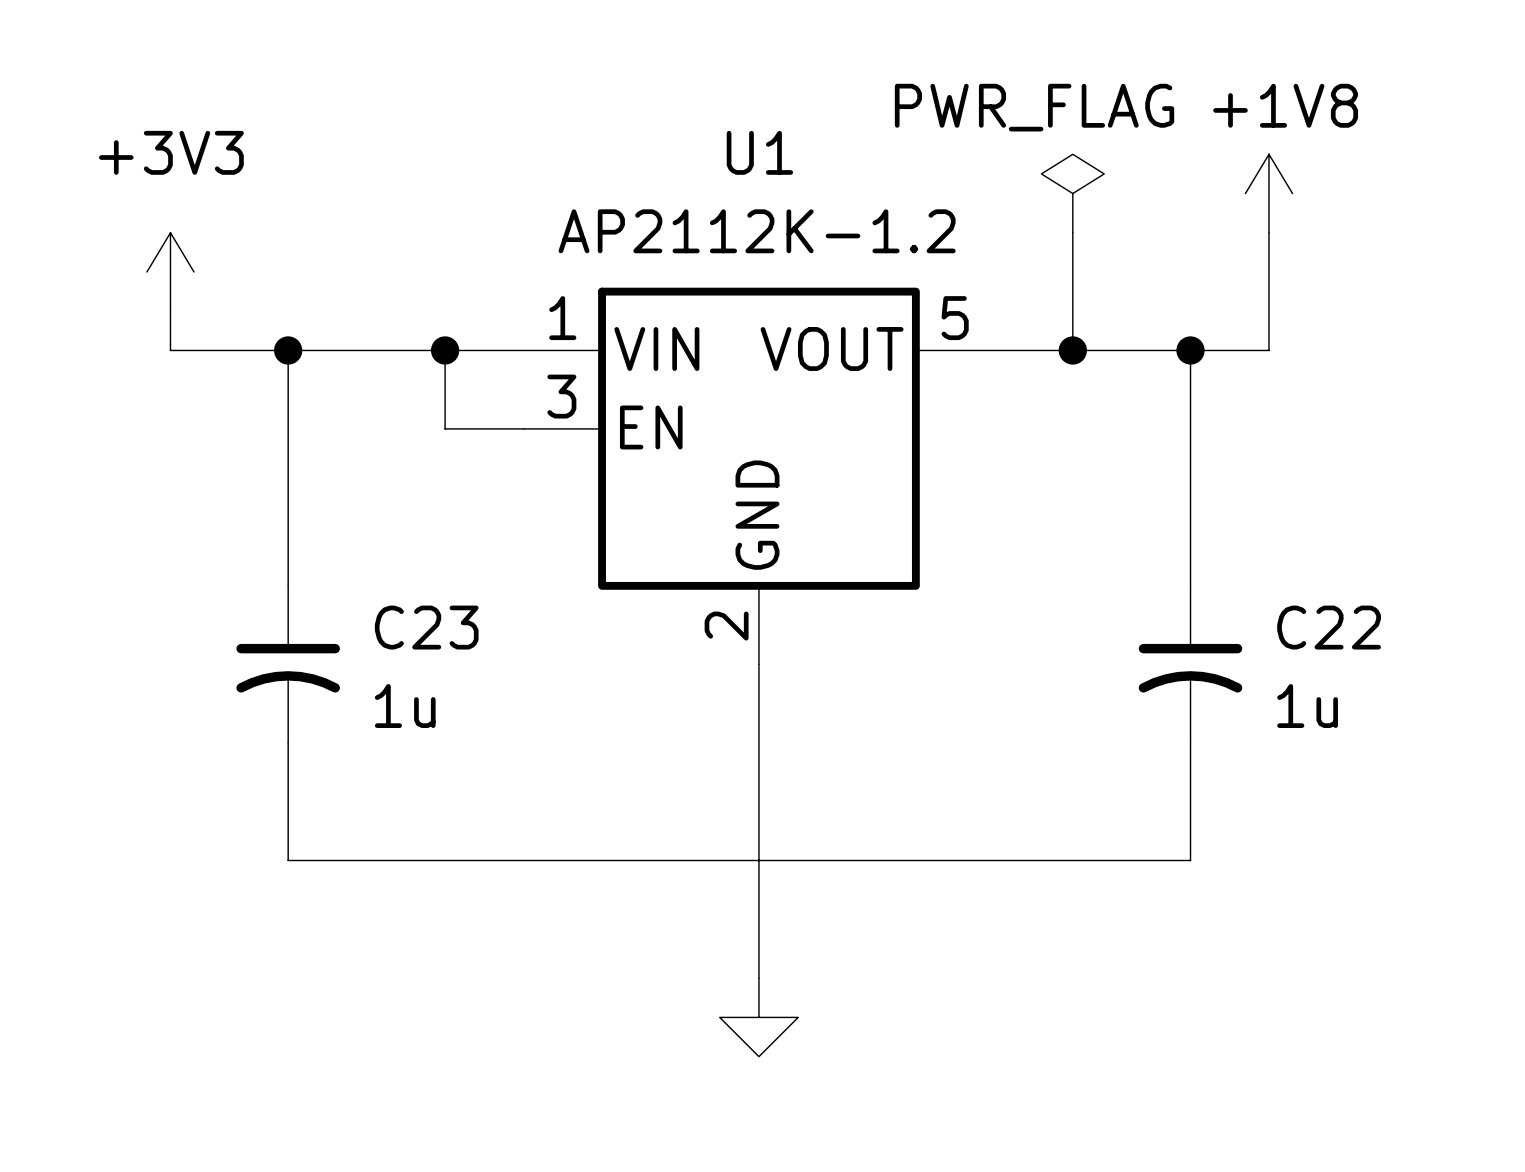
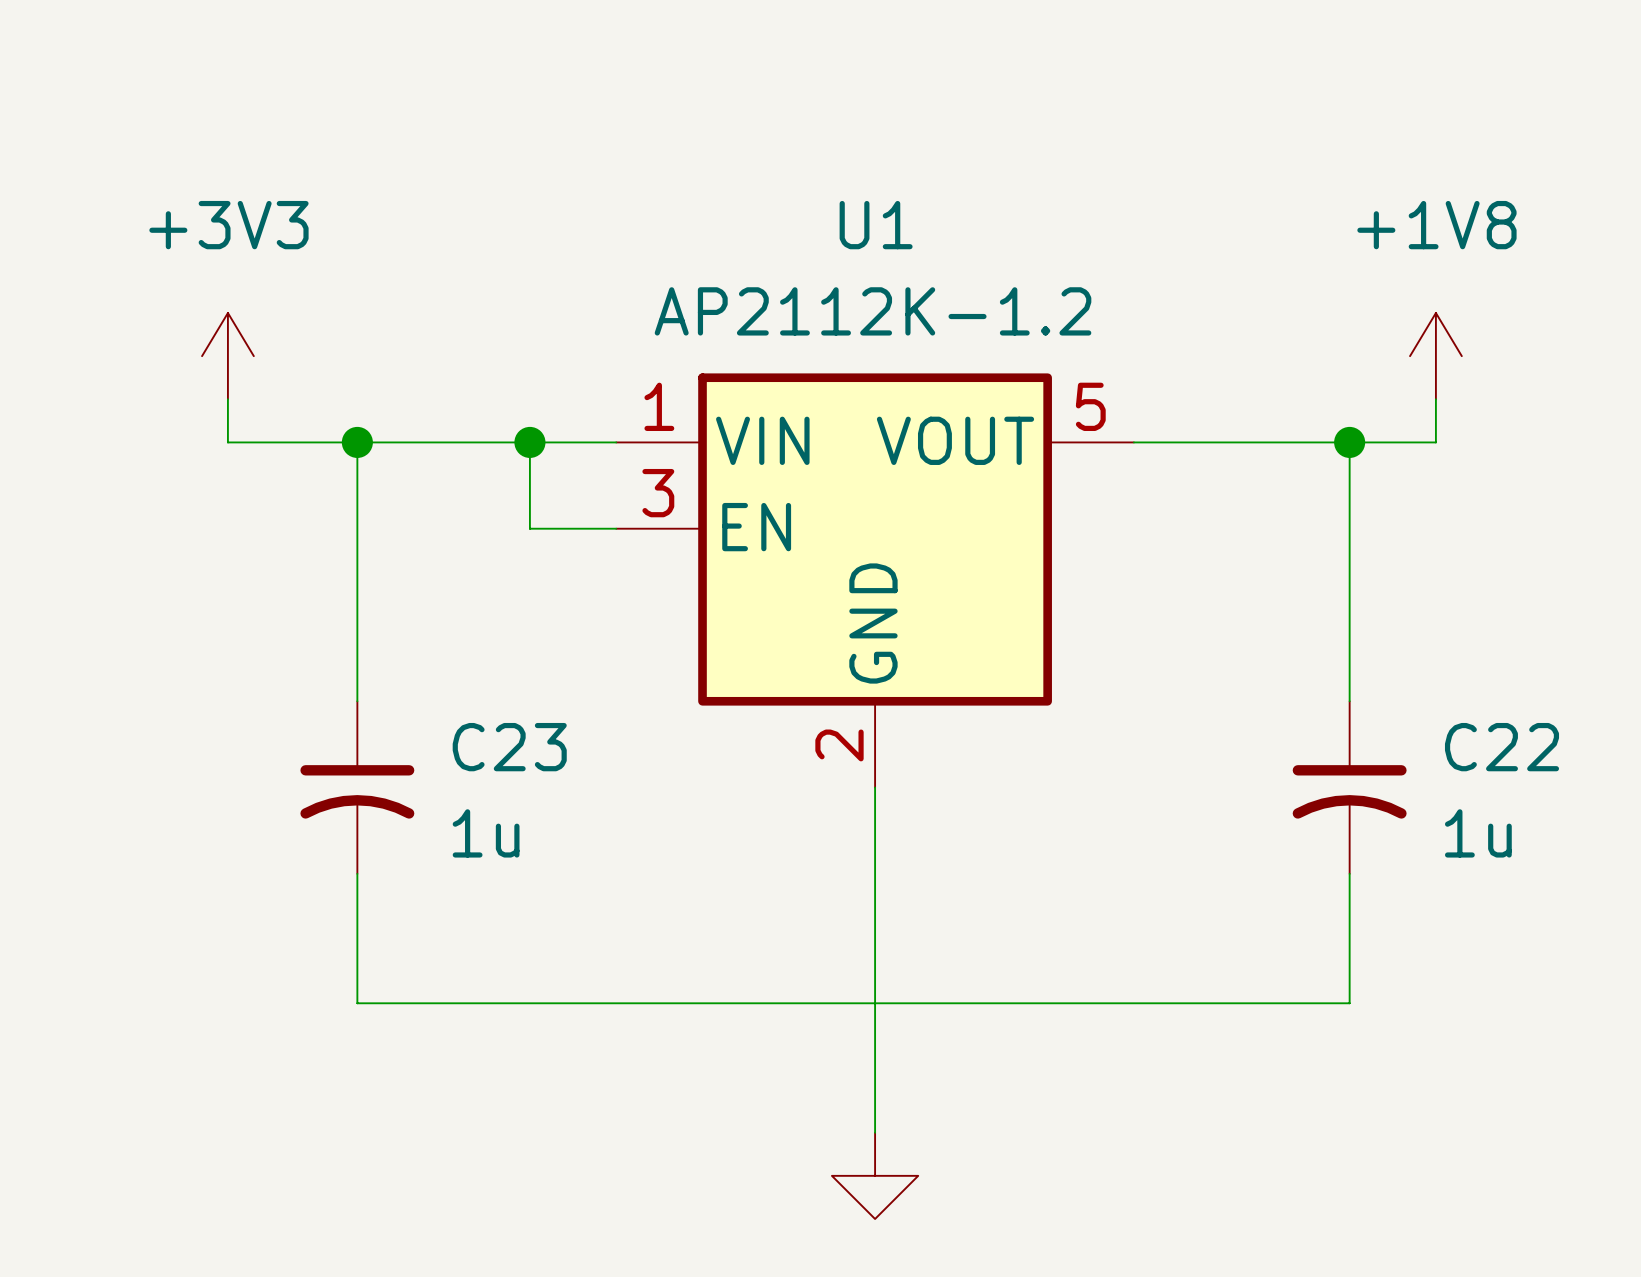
power symbol text position: +1V8 (1285, 105) -> +1V8 (1436, 225)
power symbol: PWR_FLAG (1072, 193) -> none
power symbol position: +1V8 (1268, 193) -> +1V8 (1435, 356)
wire: (1072, 232) (1072, 350) -> none
junction: (1072, 350) -> none

